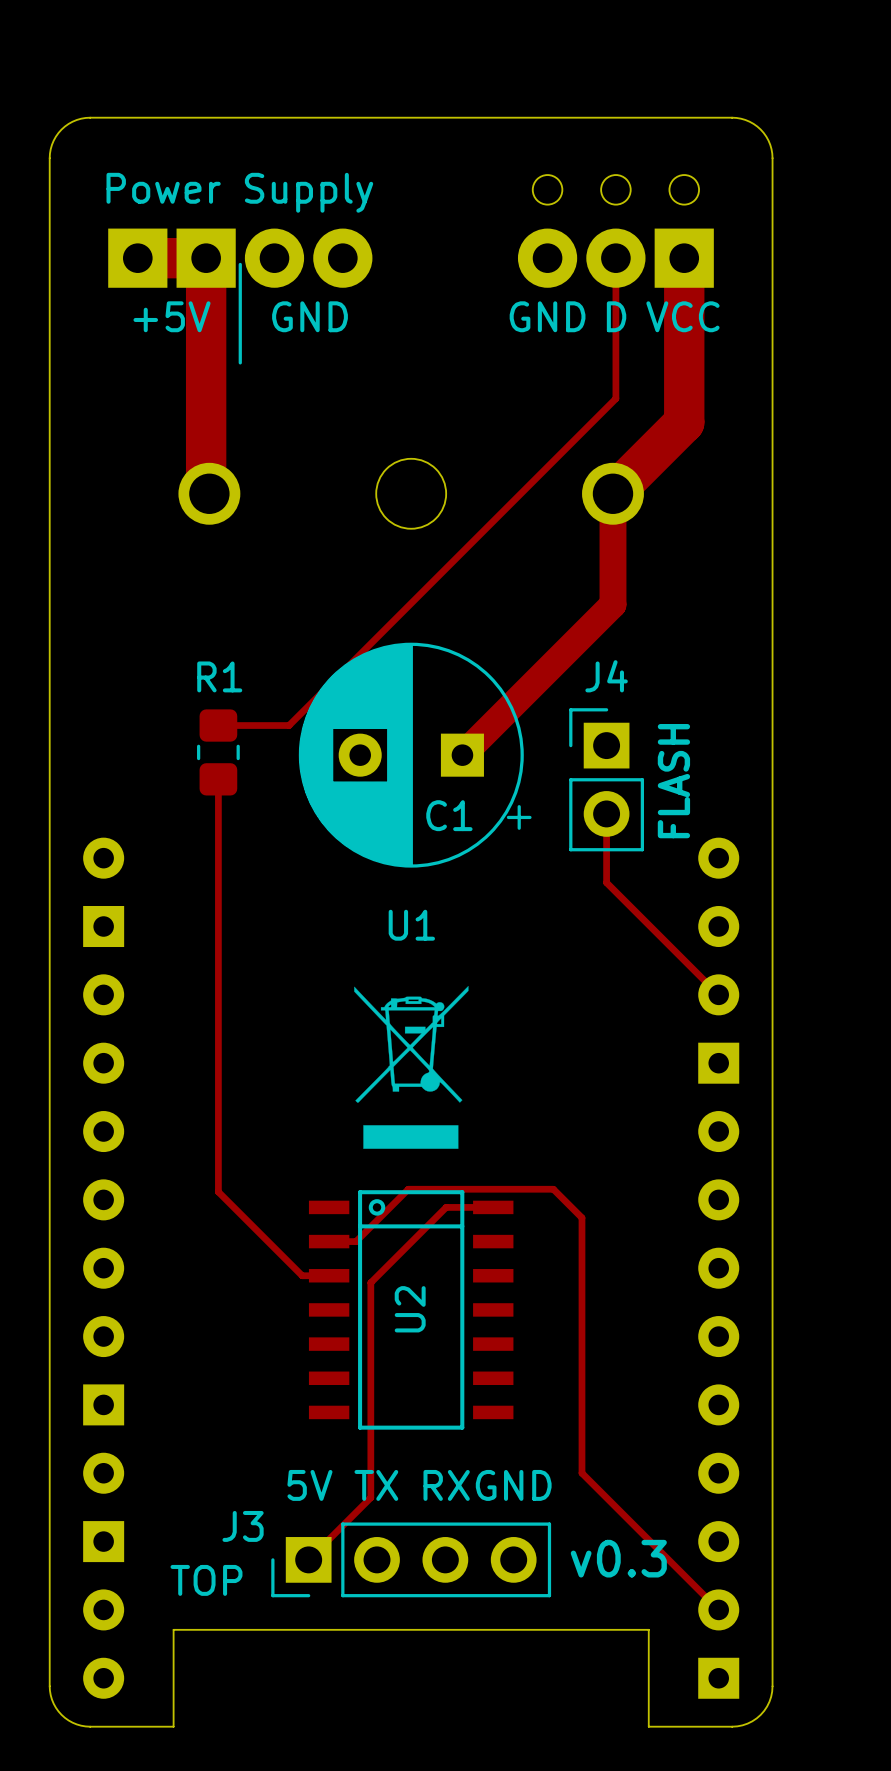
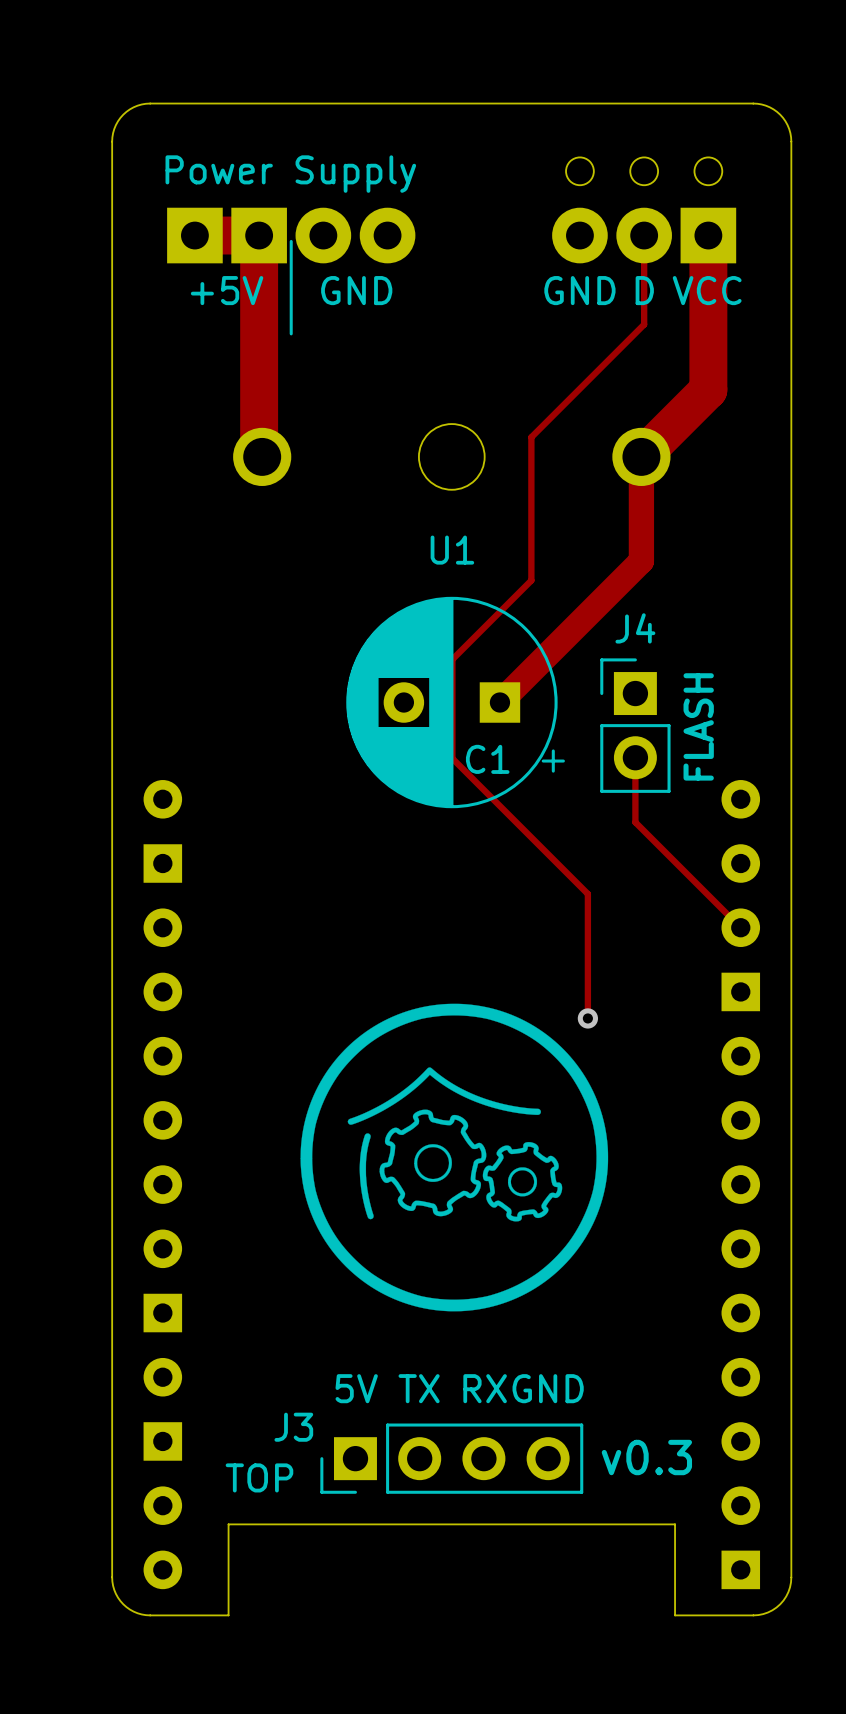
track: (615, 352) (615, 398) (289, 725) (218, 725) -> (644, 324) (531, 437) (531, 580) (452, 659) (452, 758) (587, 893) (587, 1018)
R1: (218, 752) -> none
track: (218, 779) (218, 1191) (302, 1275) (329, 1275) -> none
U1 name position: U1 (411, 925) -> U1 (452, 550)
drawing: [354, 986, 469, 1149] -> none
drawing: none -> [300, 1003, 609, 1312]
via: none -> (587, 1018)
track: (493, 1207) (446, 1207) (370, 1282) (370, 1497) (308, 1559) -> none
track: (329, 1241) (356, 1241) (408, 1189) (553, 1189) (581, 1217) (581, 1473) (718, 1609) -> none
U2: (411, 1309) -> none

